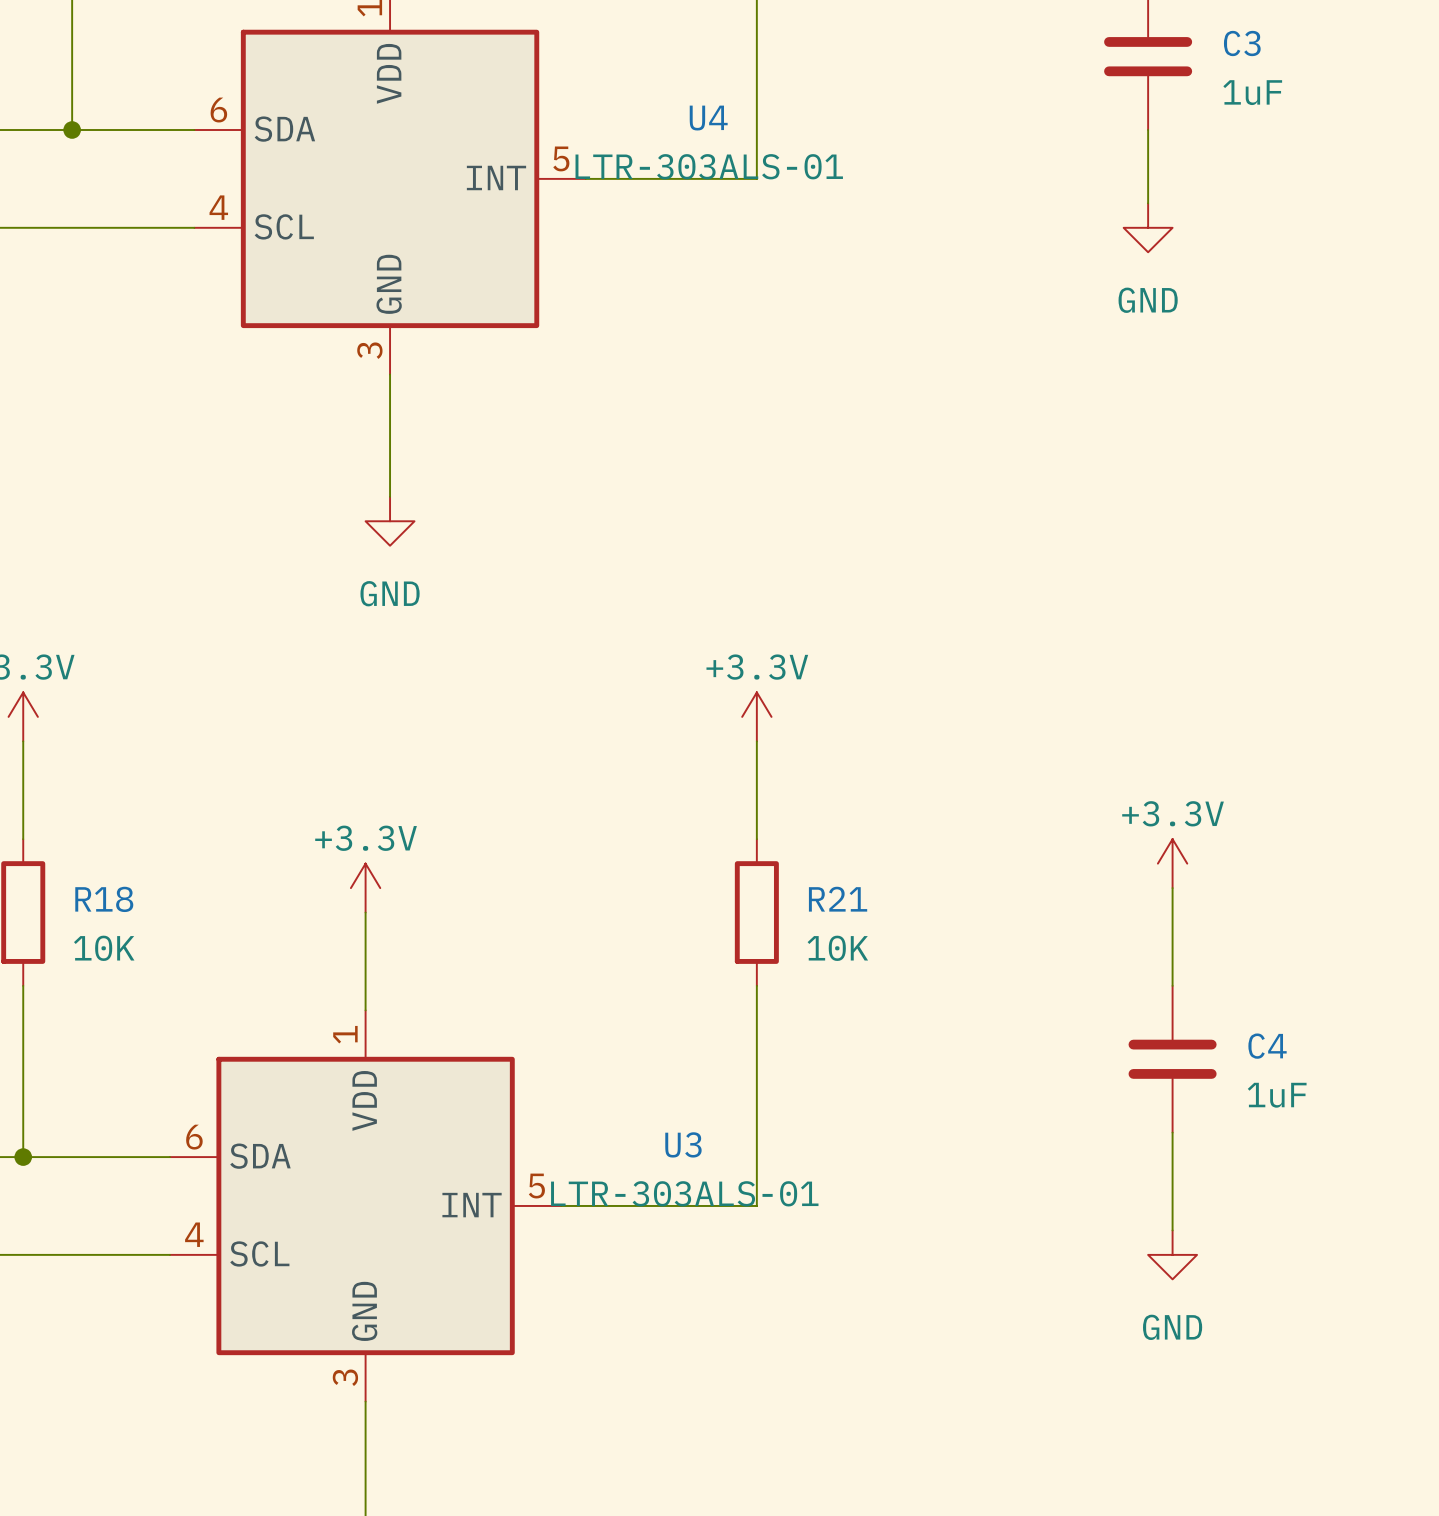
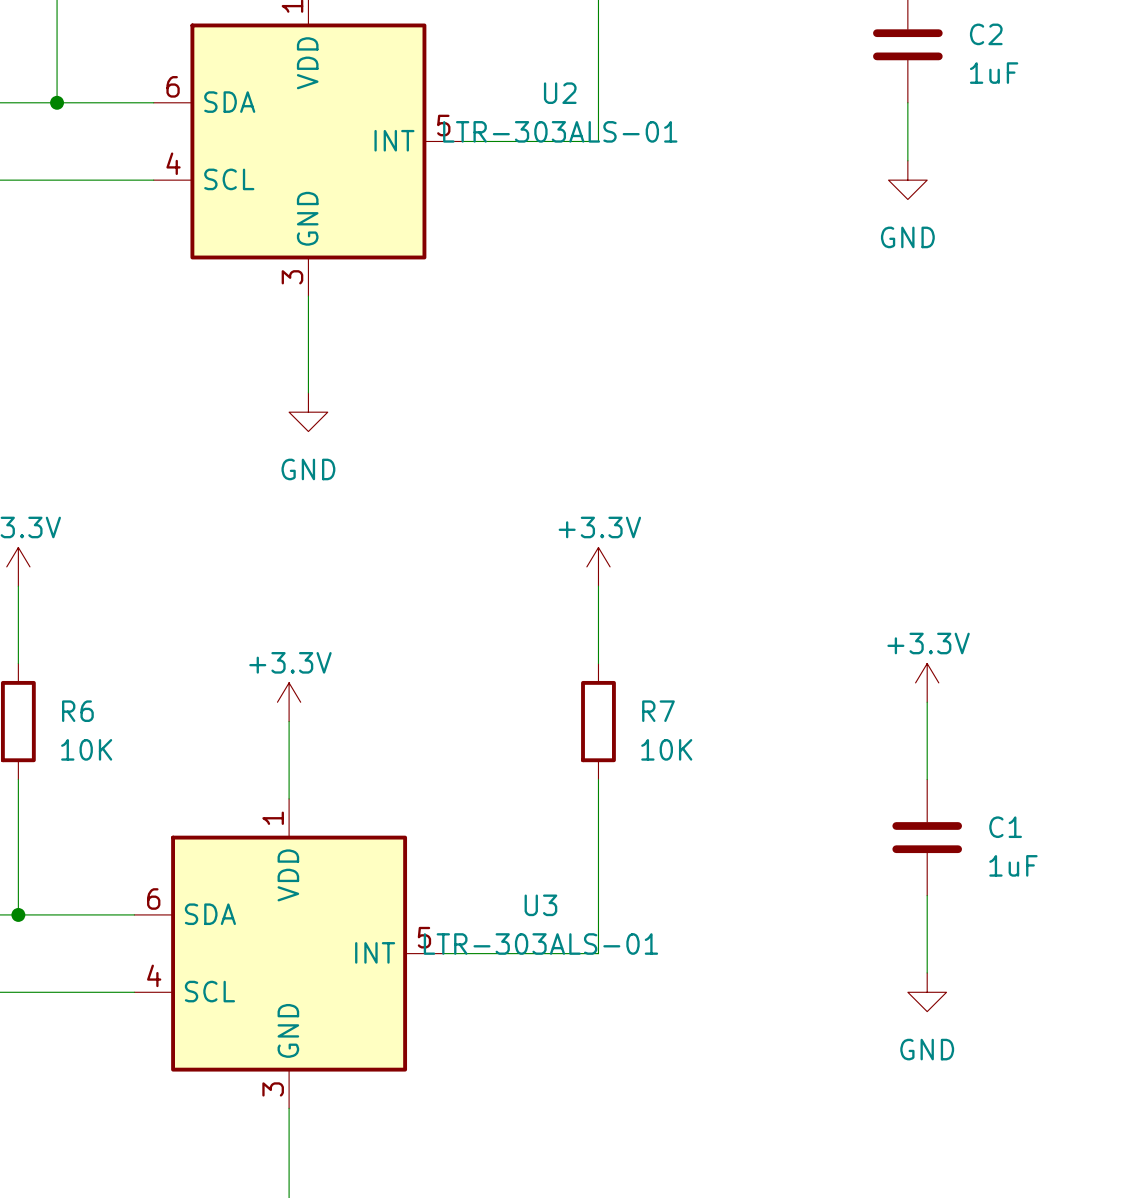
C3 name: C3 (1242, 43) -> C2 (986, 34)
U4 name: U4 (708, 118) -> U2 (560, 93)
R18 name: R18 (104, 899) -> R6 (77, 711)
R21 name: R21 (838, 899) -> R7 (658, 711)
C4 name: C4 (1267, 1046) -> C1 (1005, 827)

